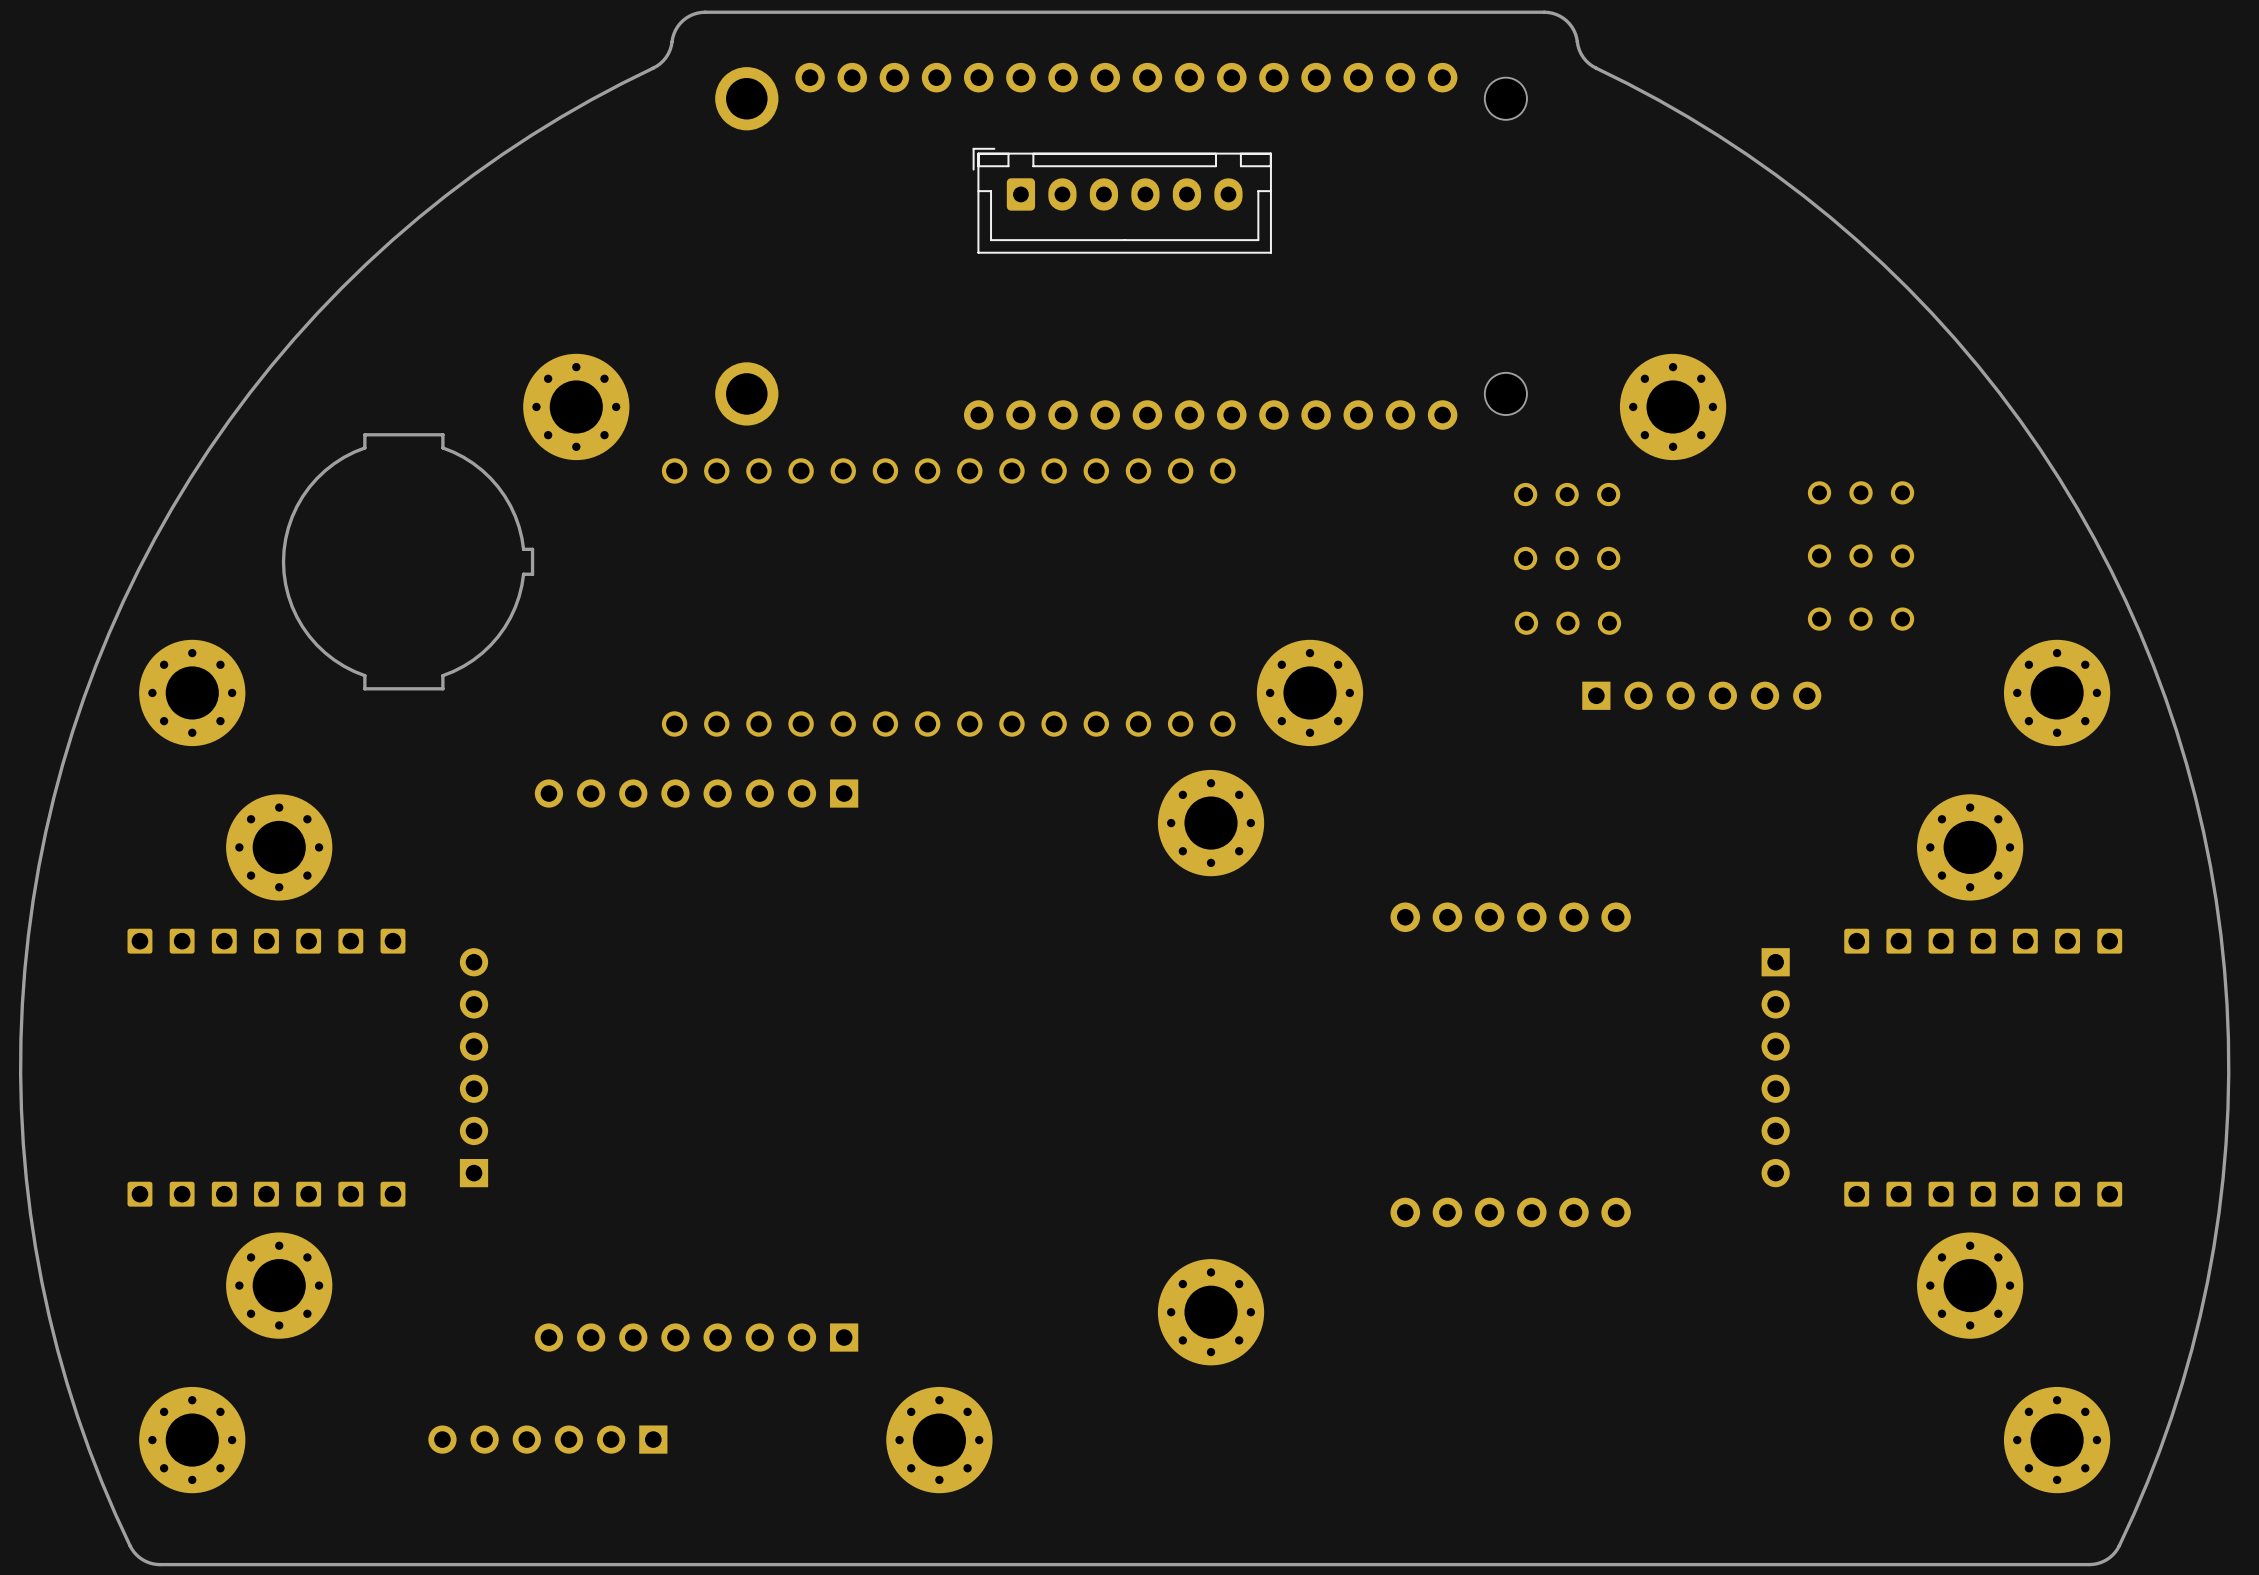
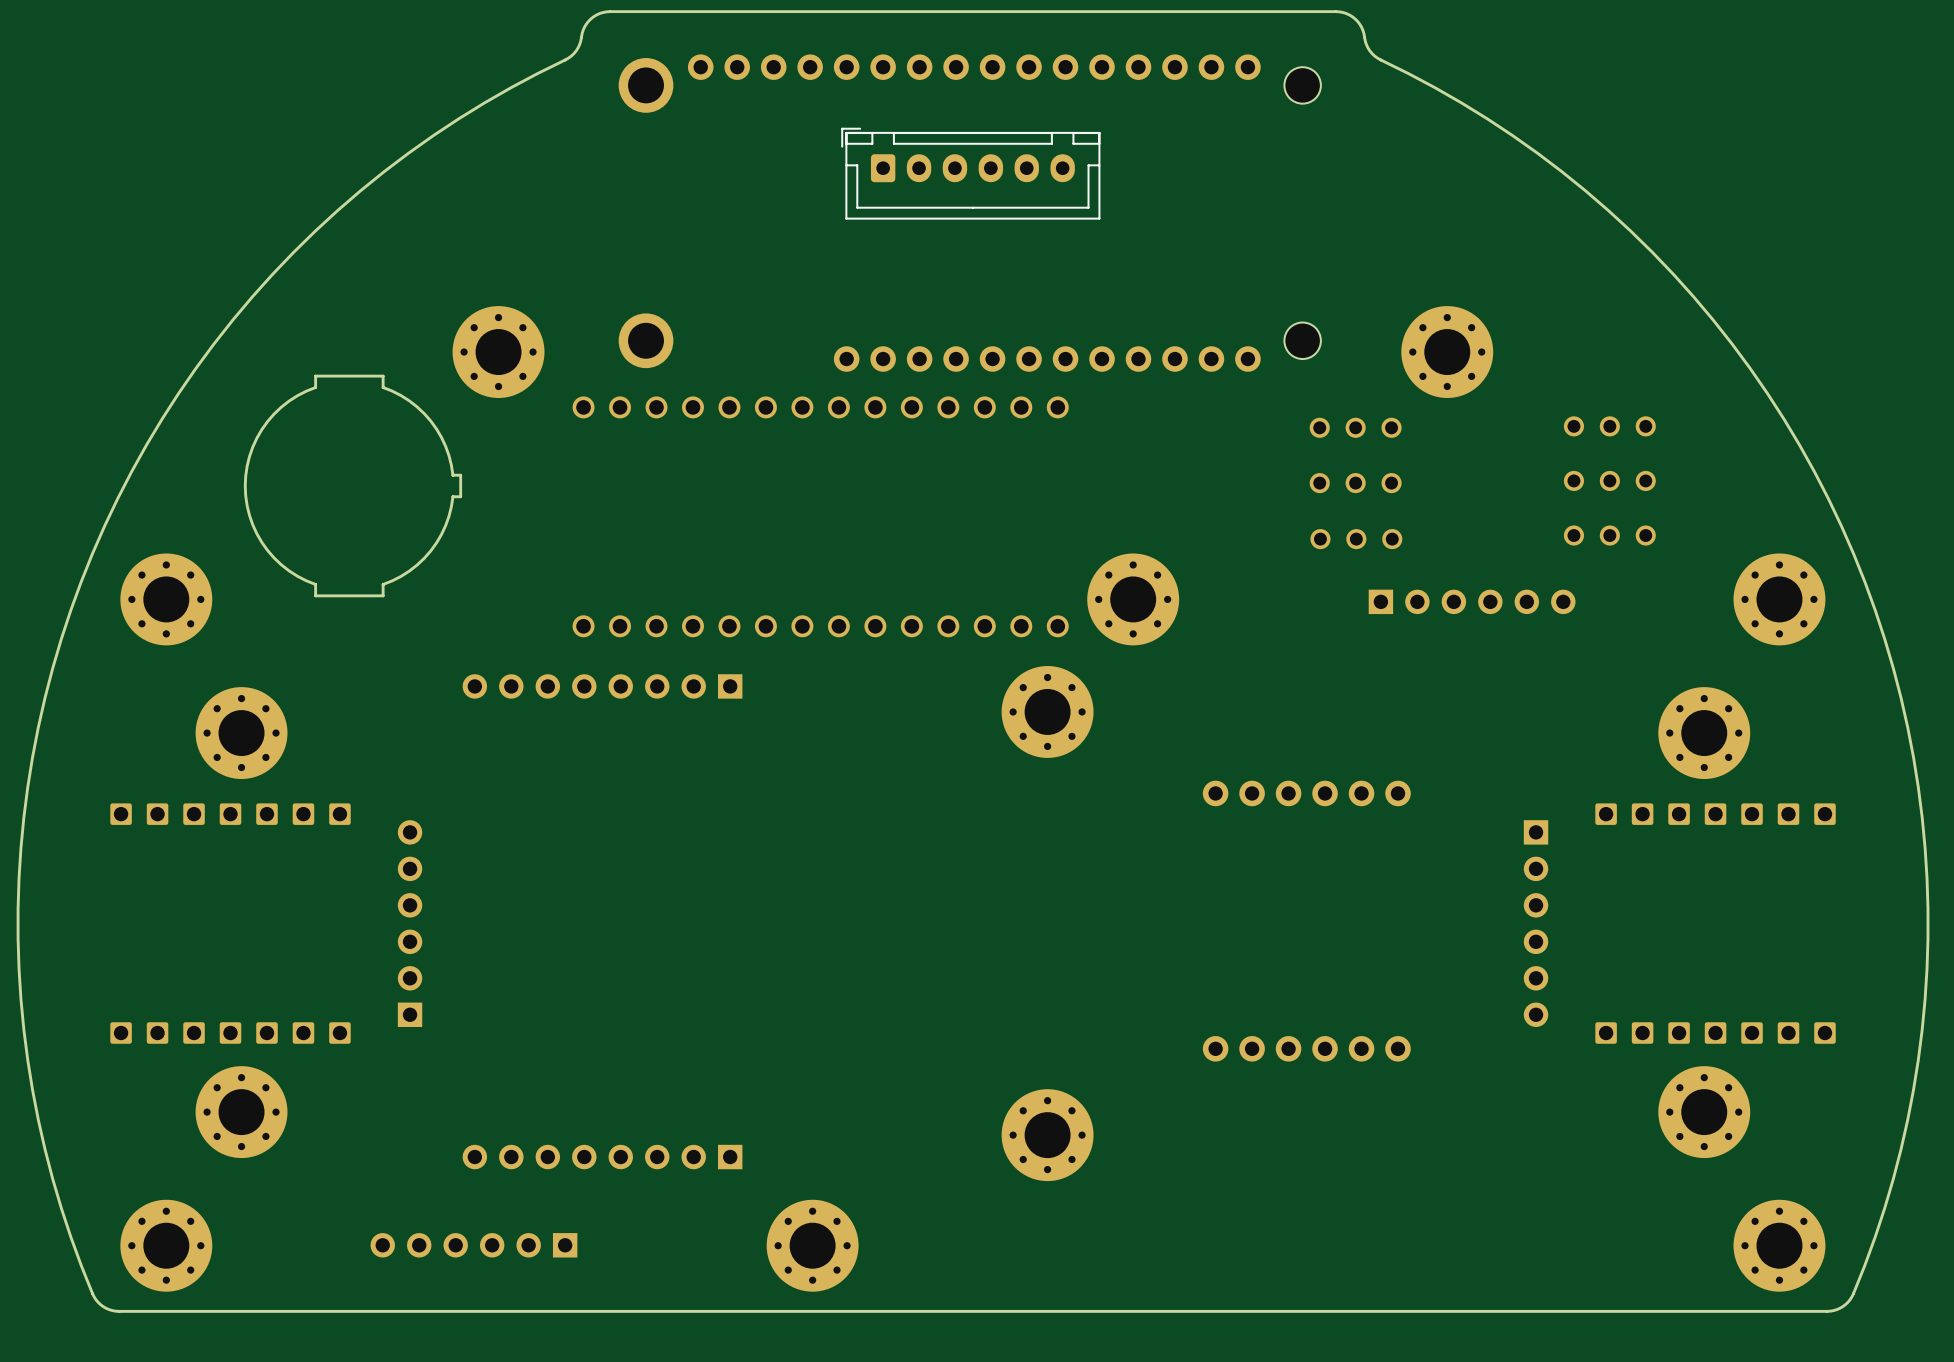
board edge: (1544, 12) (697, 13) (686, 18) (677, 26) (668, 53) (660, 63) (560, 117) (473, 174) (392, 240) (317, 313) (249, 393) (209, 449) (171, 508) (123, 601) (96, 665) (72, 731) (53, 798) (33, 900) (22, 1004) (20, 1074) (23, 1143) (35, 1247) (49, 1316) (77, 1416) (115, 1514) (130, 1545) (136, 1554) (149, 1562) (159, 1564) (2089, 1564) (2100, 1562) (2112, 1554) (2119, 1545) (2133, 1514) (2160, 1449) (2191, 1349) (2213, 1247) (2226, 1143) (2228, 1039) (2220, 935) (2210, 866) (2195, 798) (2165, 698) (2125, 601) (2077, 508) (2040, 449) (1999, 393) (1931, 313) (1882, 263) (1803, 195) (1747, 154) (1688, 117) (1592, 66) (1581, 53) (1575, 33) (1569, 23) (1556, 14) (1544, 12) -> (1336, 11) (1346, 13) (1357, 21) (1362, 30) (1367, 47) (1377, 58) (1461, 102) (1512, 135) (1561, 171) (1630, 230) (1673, 274) (1732, 343) (1783, 418) (1828, 498) (1864, 581) (1893, 668) (1913, 757) (1925, 847) (1927, 939) (1922, 1029) (1907, 1119) (1884, 1208) (1864, 1265) (1847, 1302) (1839, 1308) (1826, 1311) (119, 1311) (109, 1309) (98, 1302) (81, 1265) (52, 1179) (32, 1090) (23, 1029) (18, 939) (19, 878) (23, 817) (32, 757) (52, 668) (70, 610) (92, 553) (117, 498) (146, 444) (195, 368) (252, 296) (293, 252) (360, 190) (433, 135) (484, 102) (571, 56) (578, 47) (586, 24) (593, 16) (603, 12) (1336, 11)

